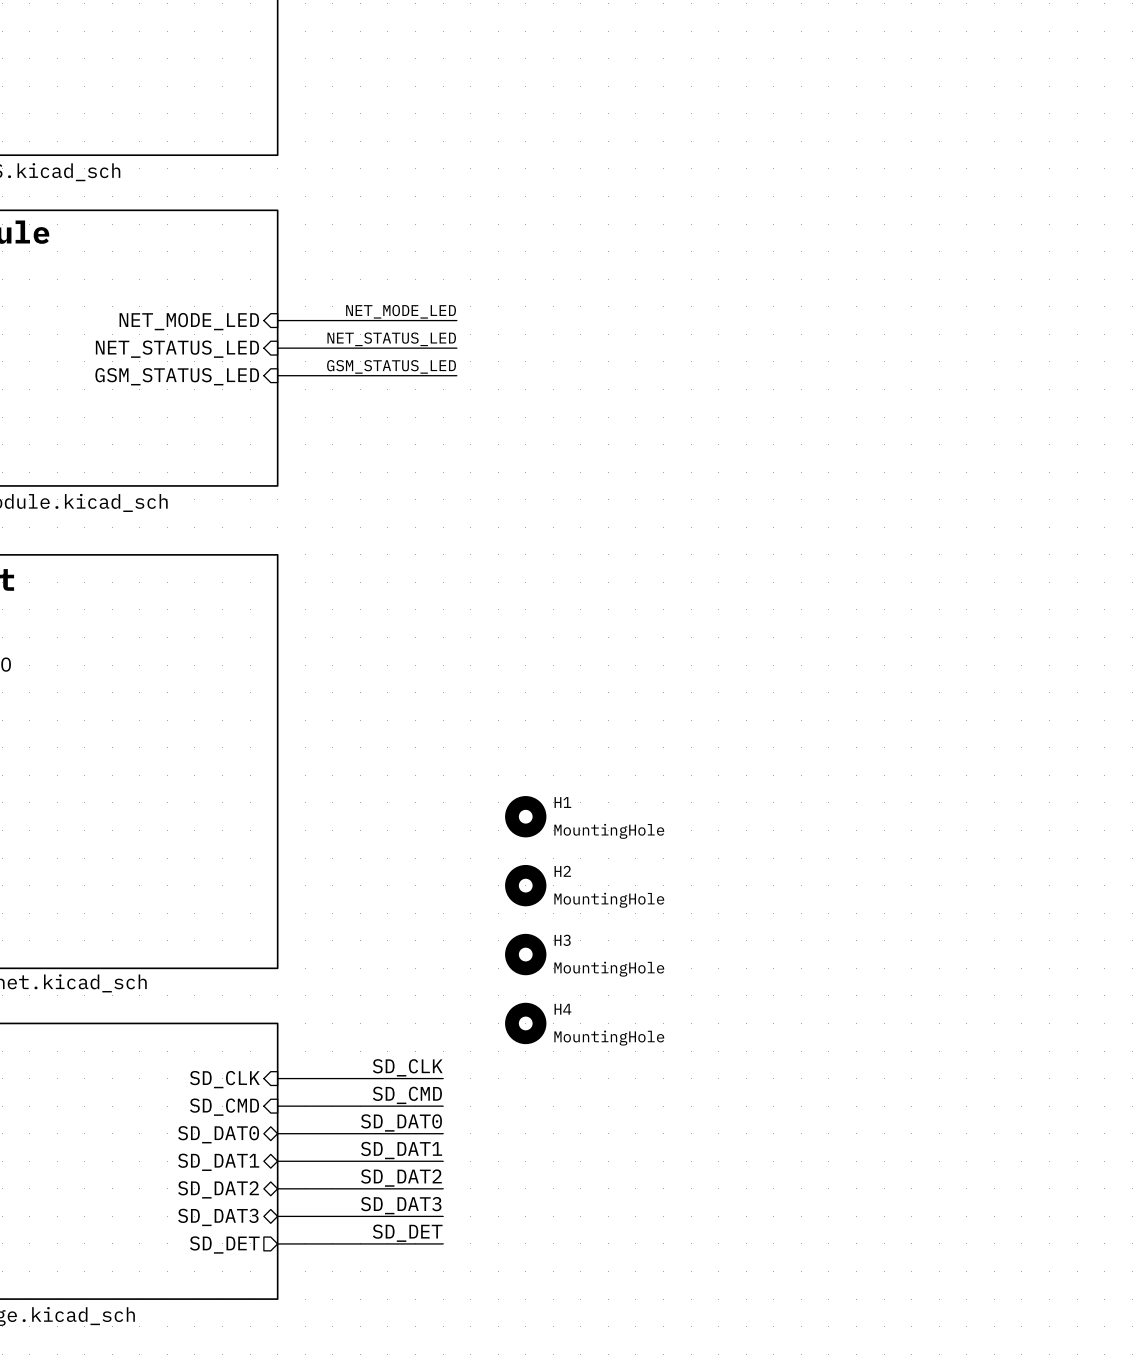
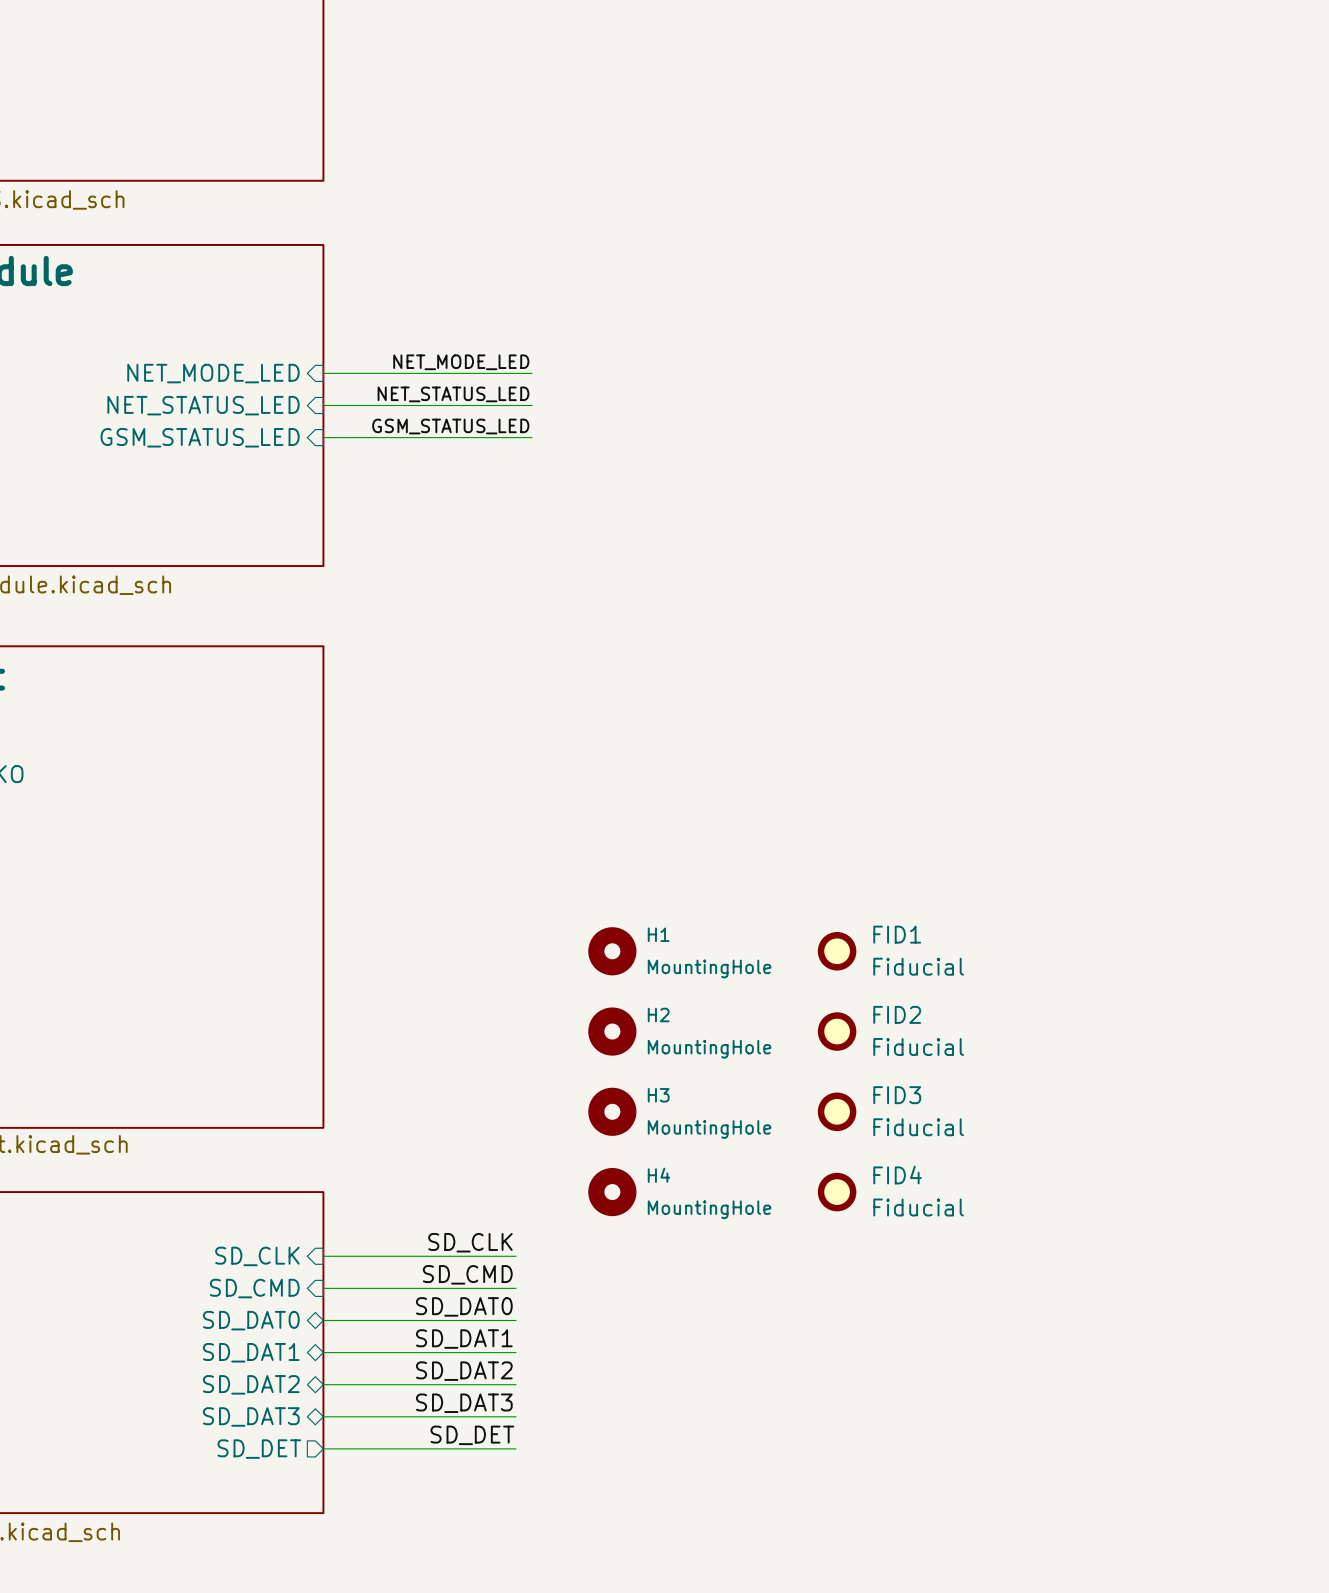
FID1: none -> Fiducial (837, 951)
FID2: none -> Fiducial (837, 1031)
FID3: none -> Fiducial (837, 1111)
FID4: none -> Fiducial (837, 1192)

